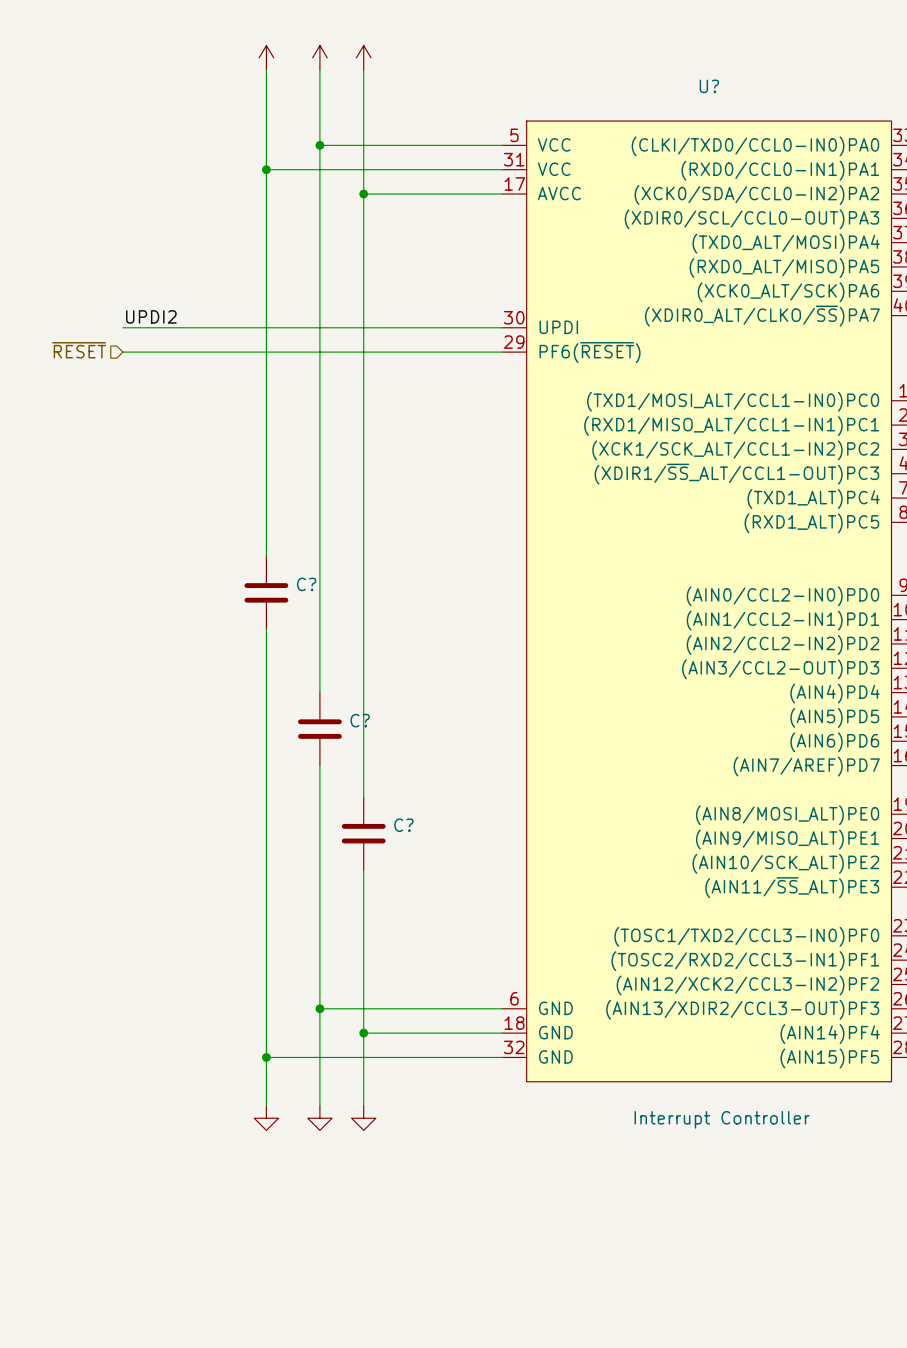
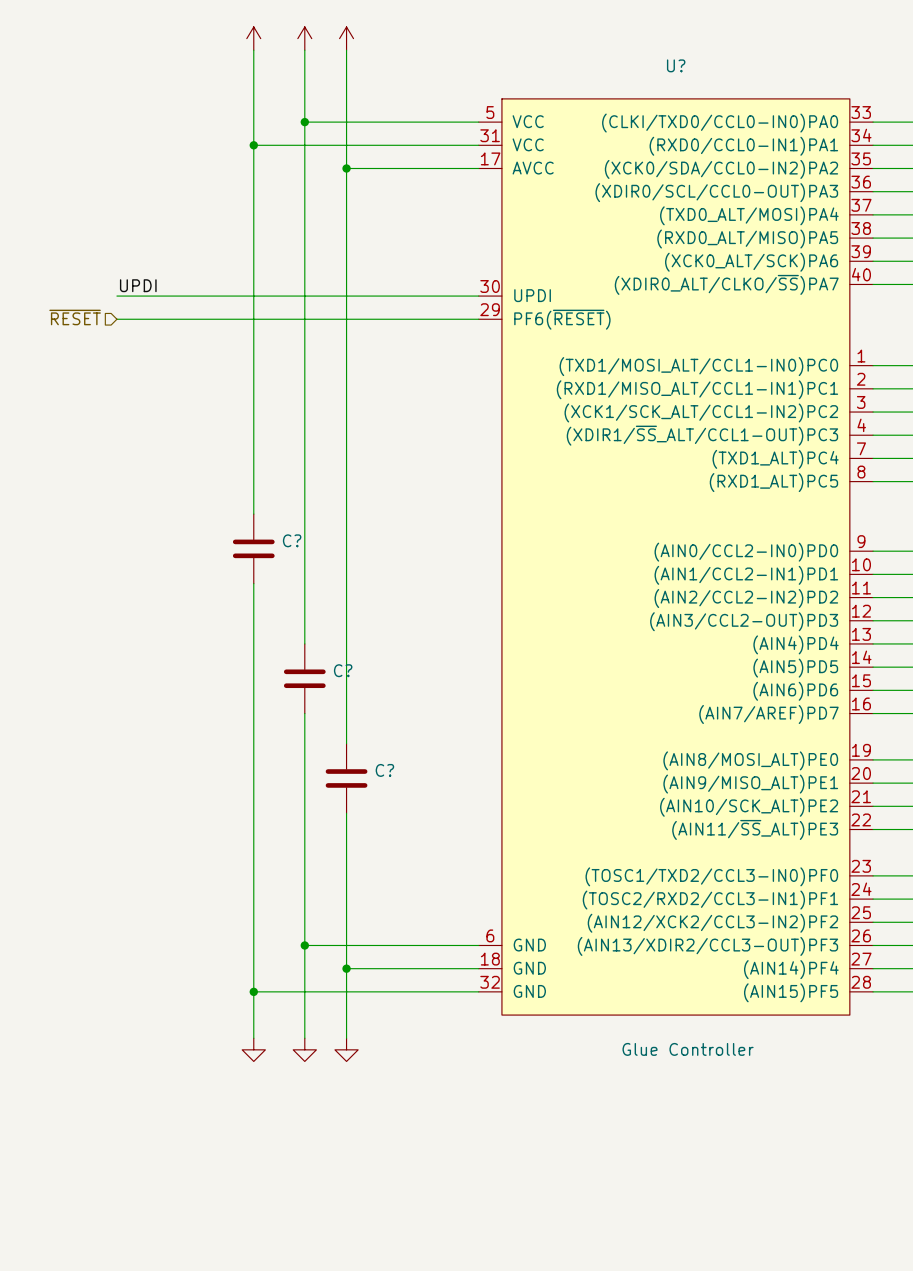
label: UPDI2 (151, 316) -> UPDI (138, 285)
U? text: Interrupt Controller (722, 1119) -> Glue Controller (688, 1049)

